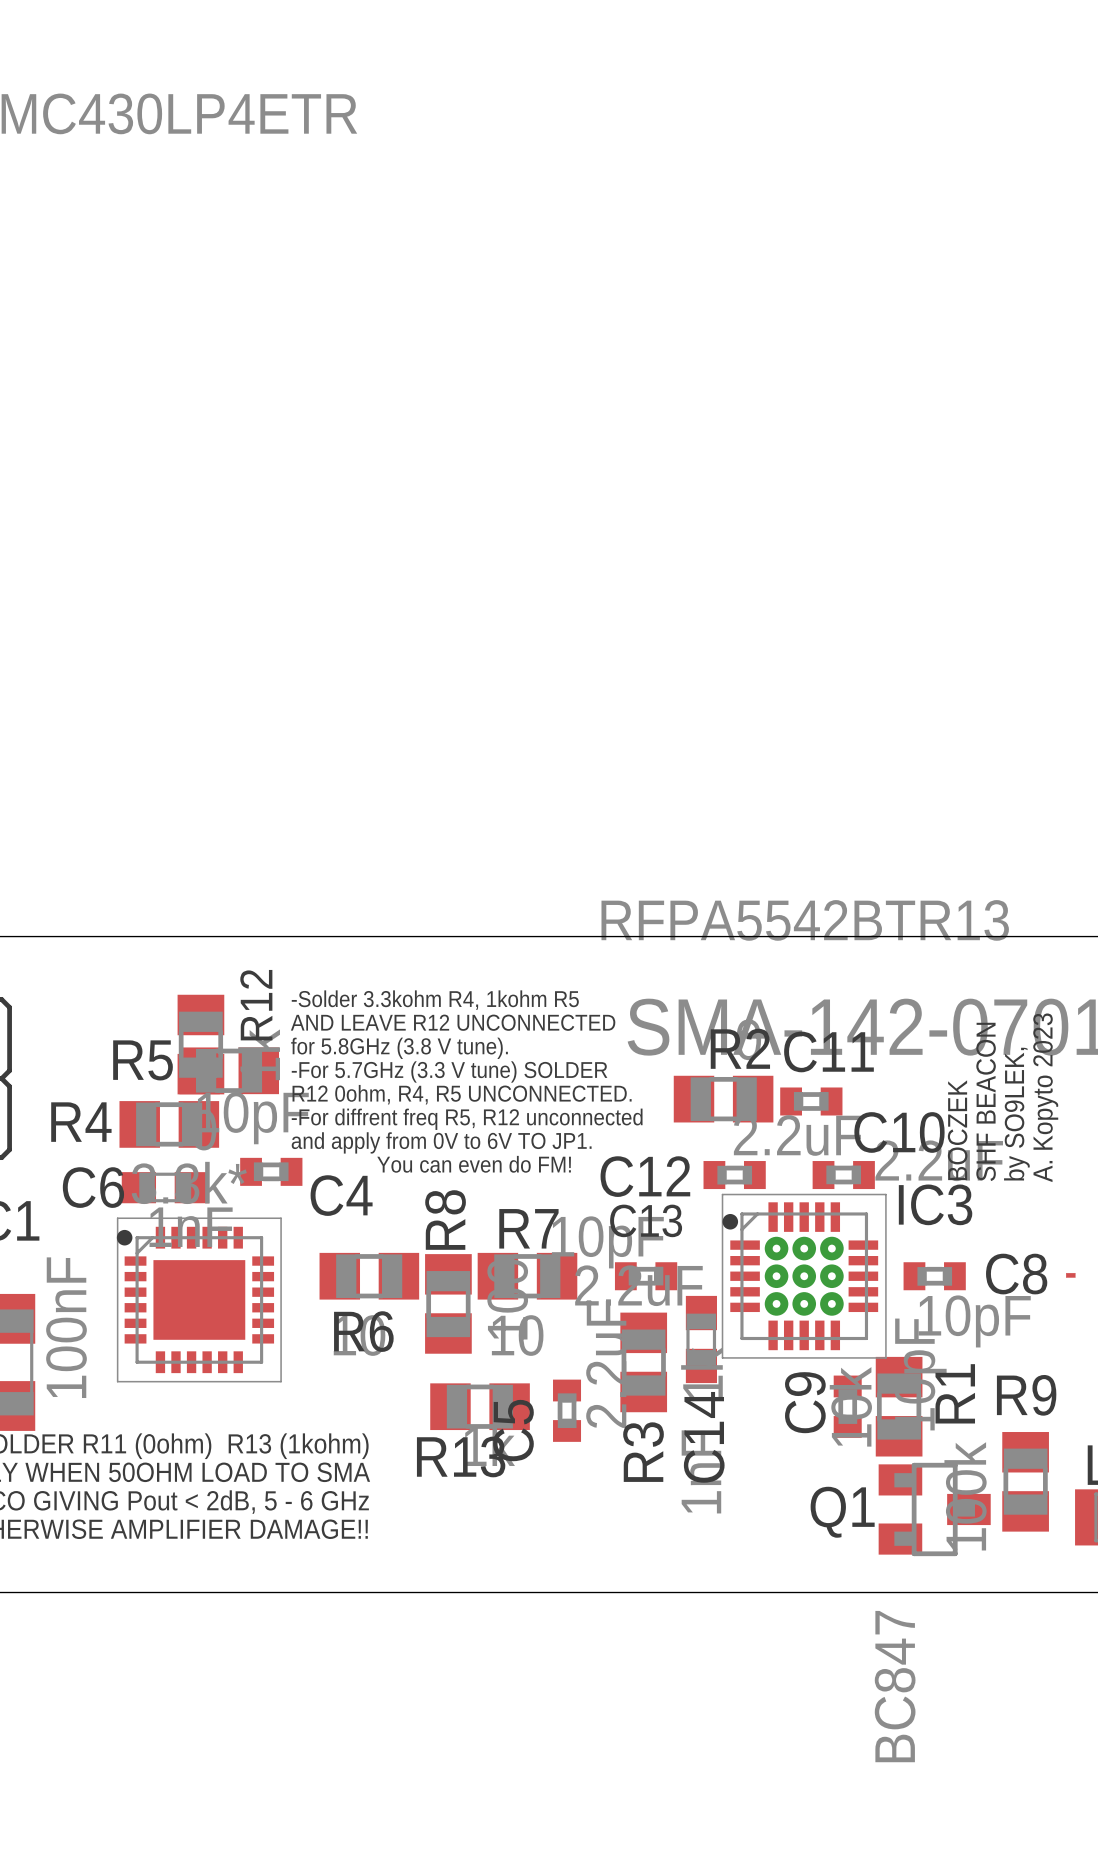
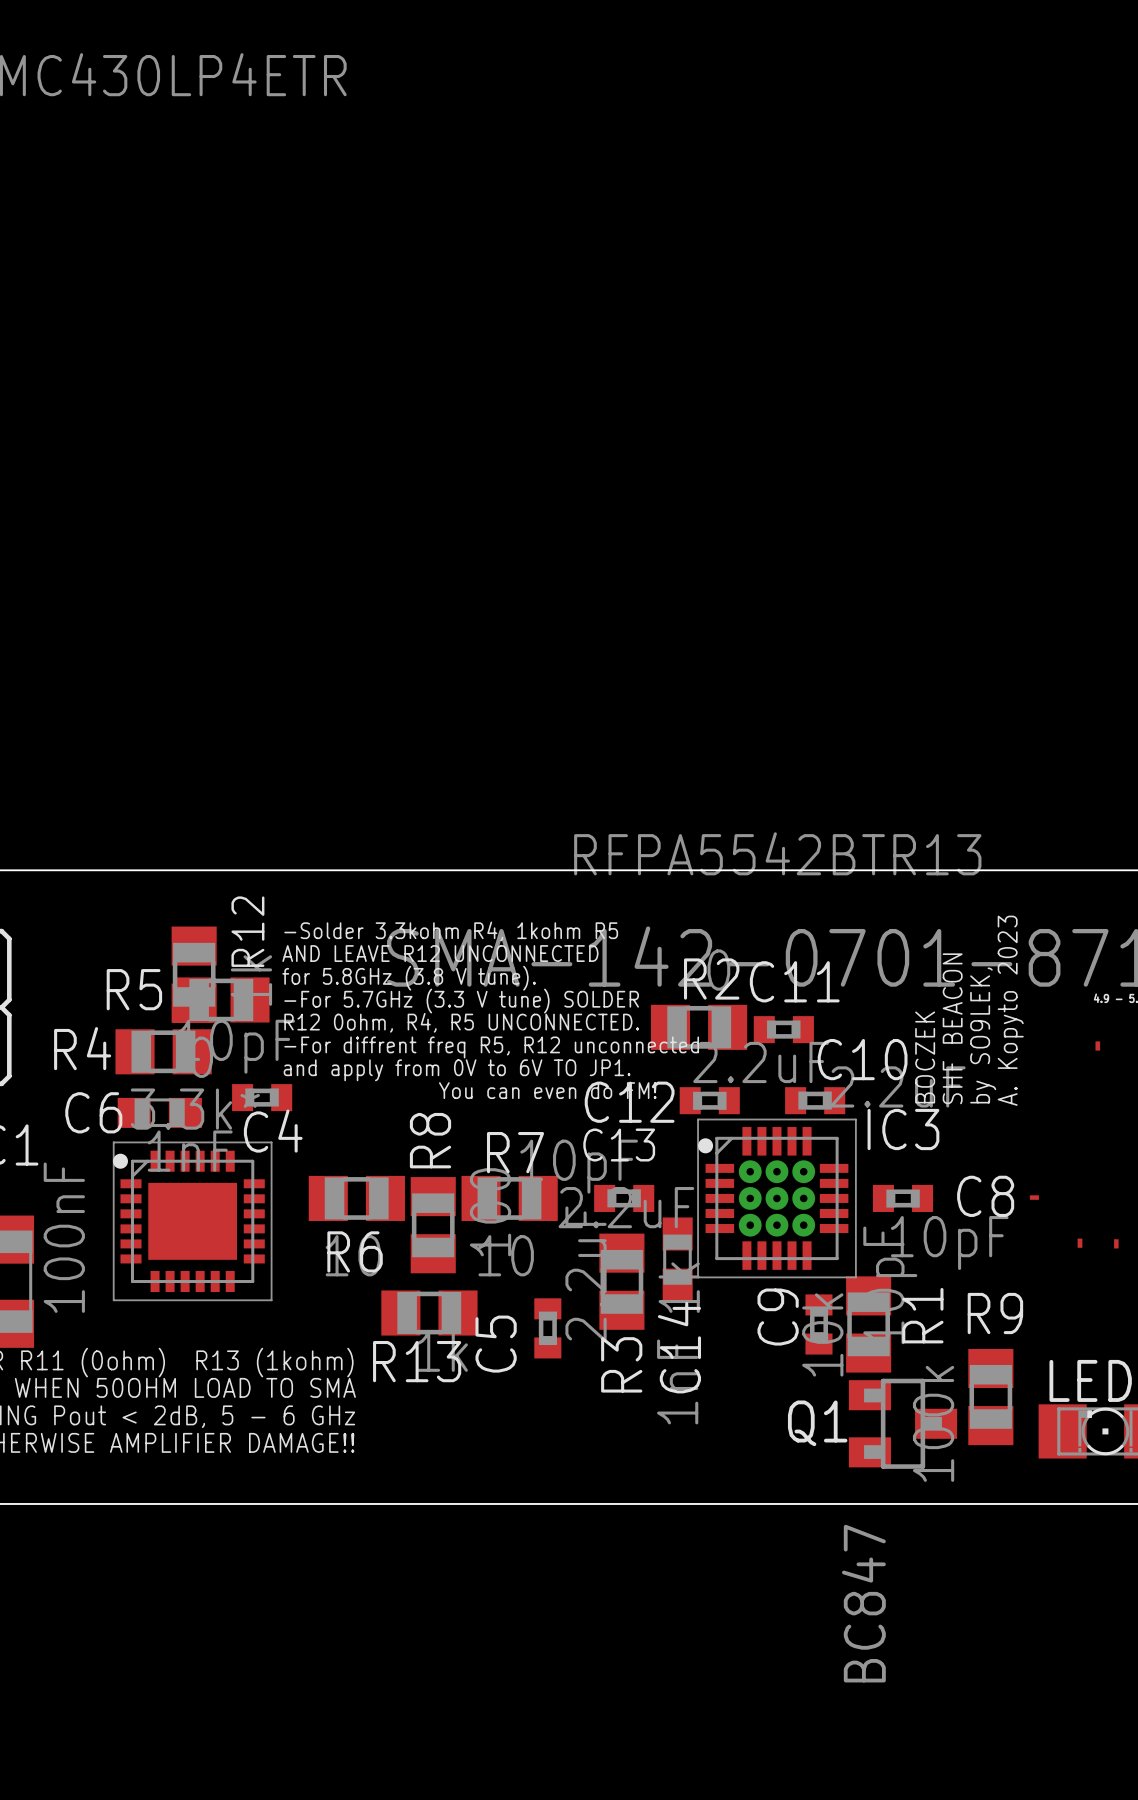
C4 name position: C4 (341, 1195) -> C4 (273, 1131)
R13 position: (480, 1406) -> (429, 1313)

